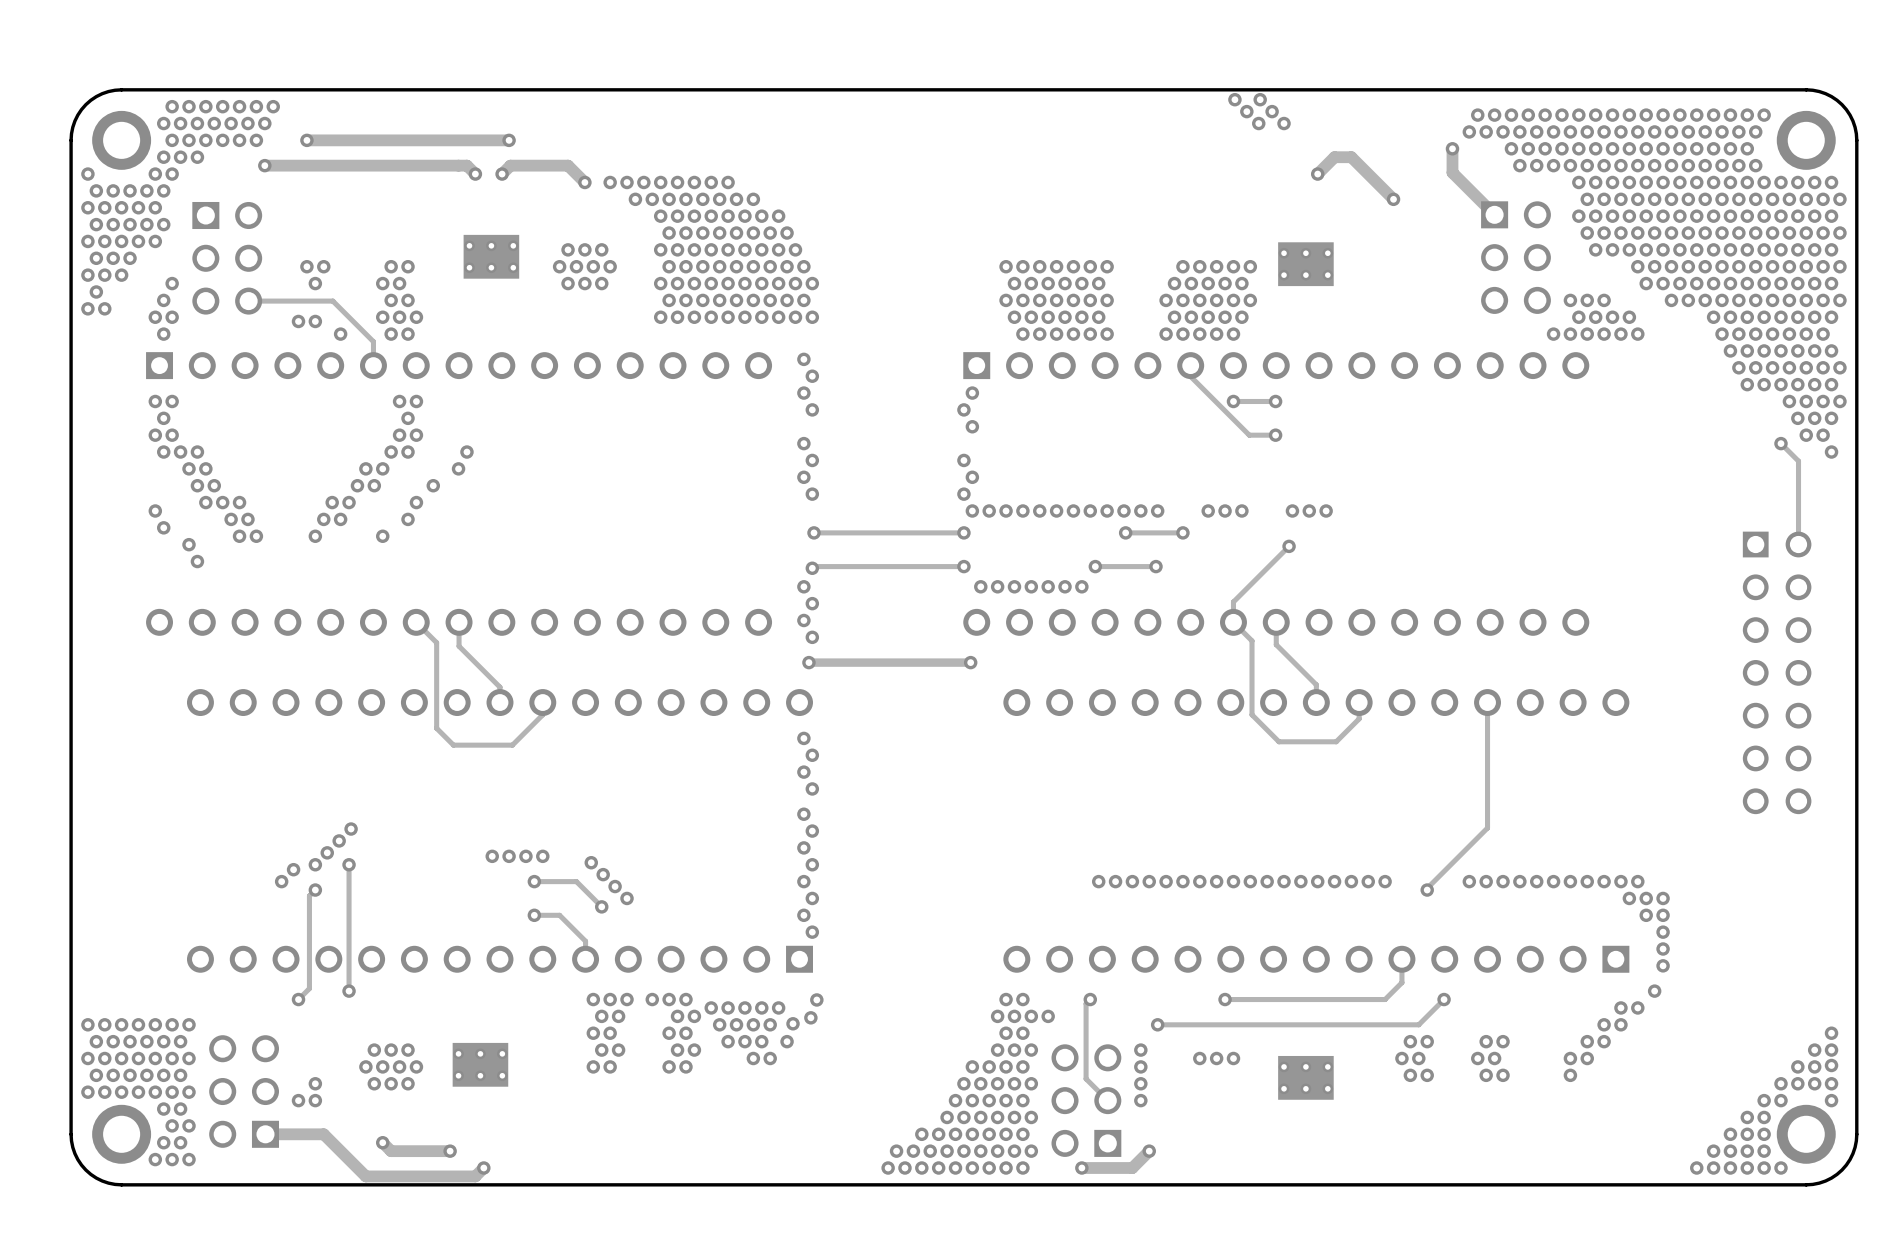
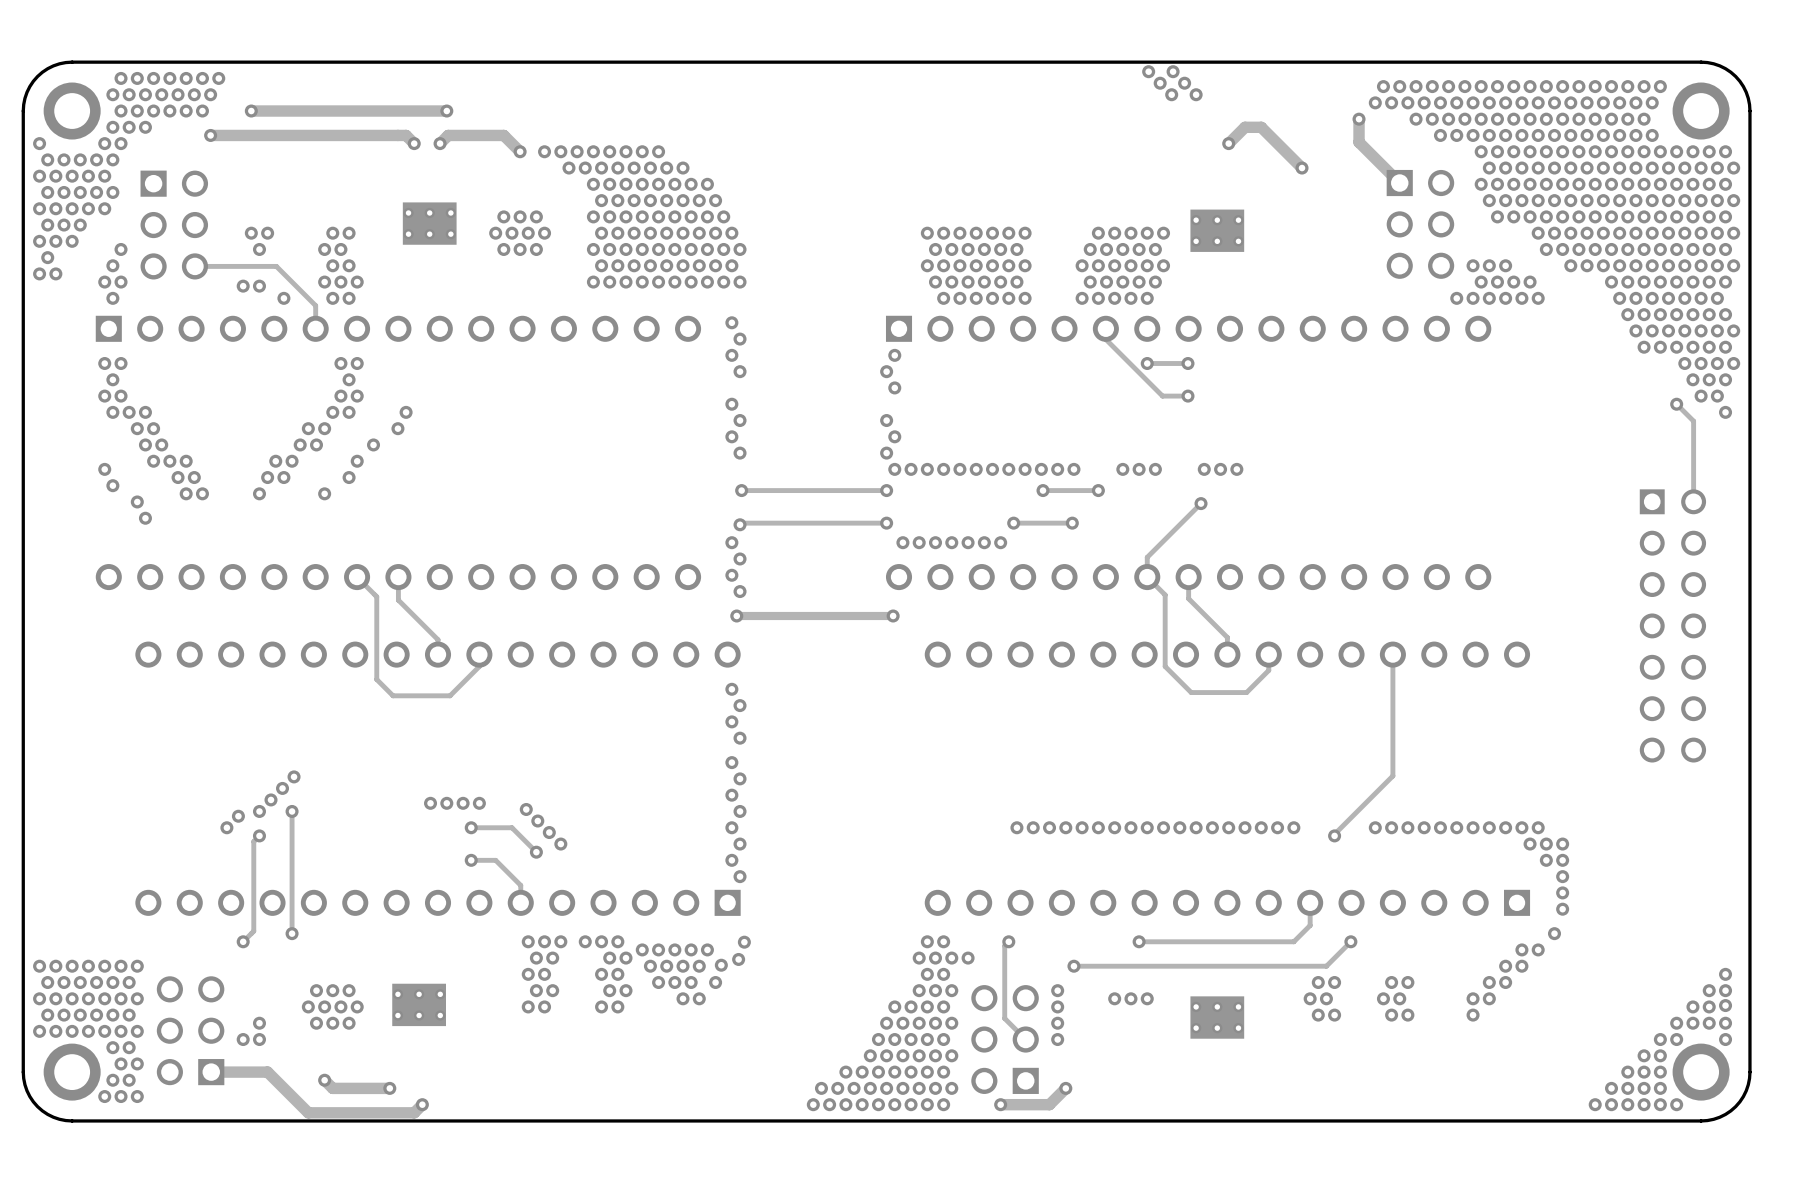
via: (1519, 165) -> none

